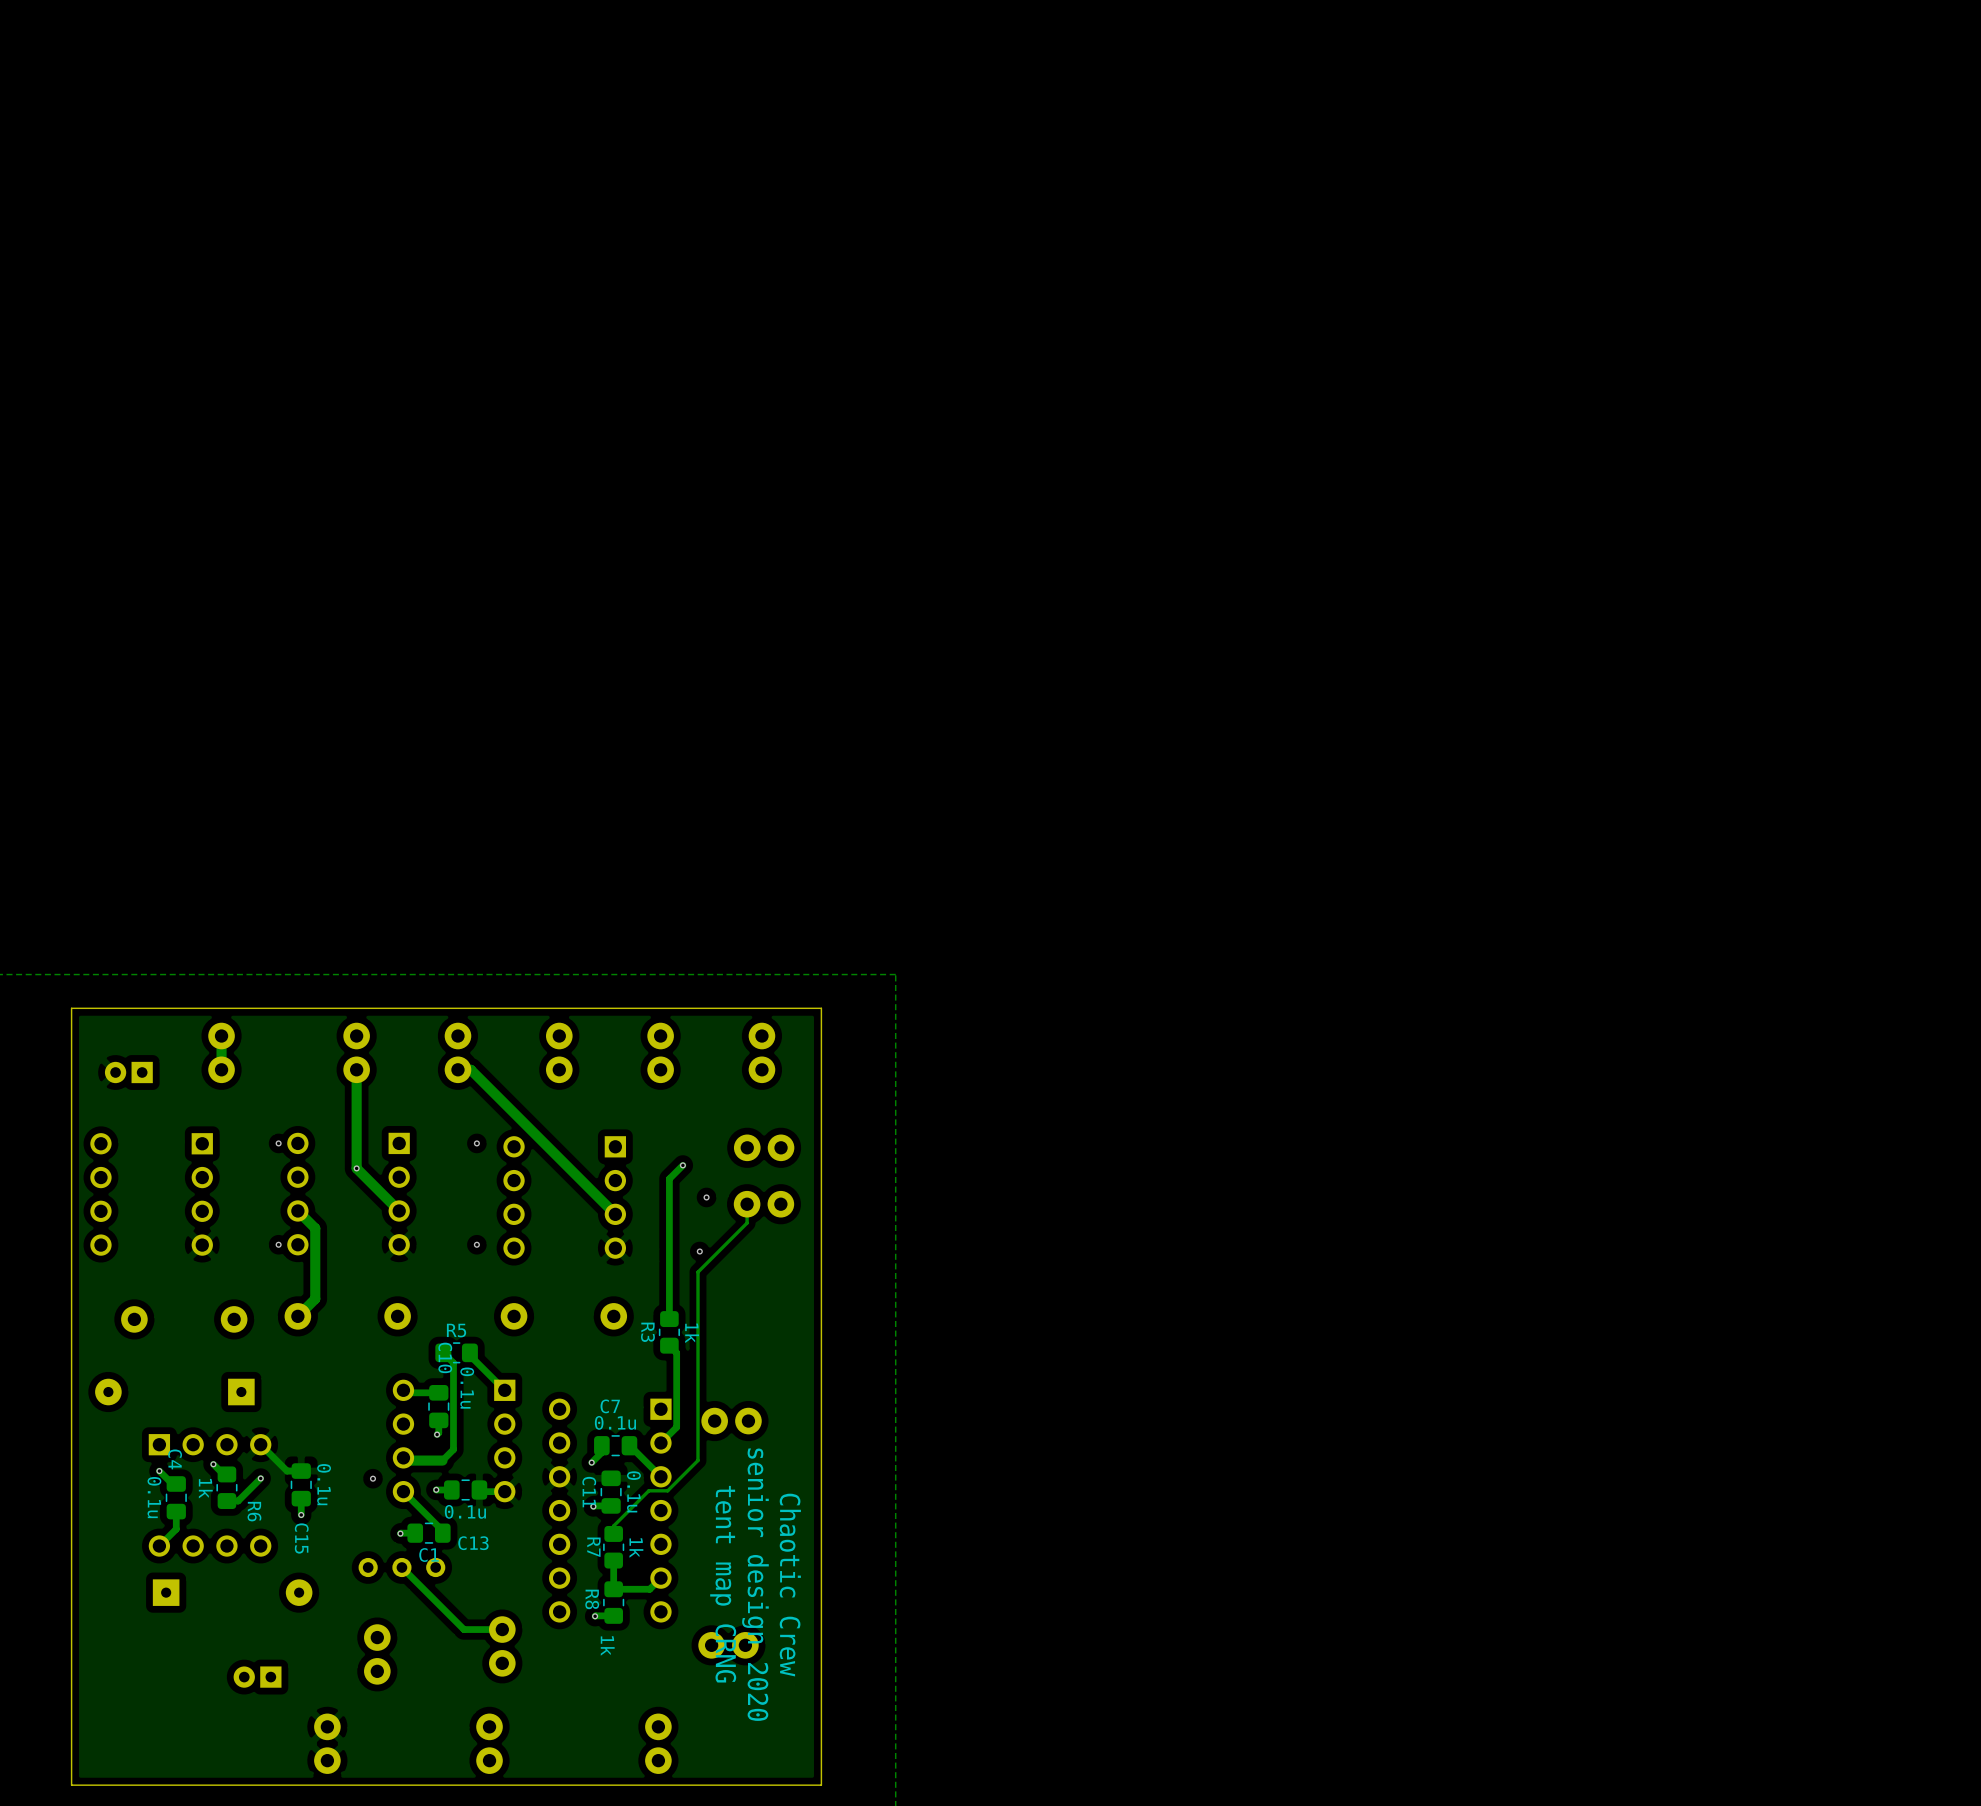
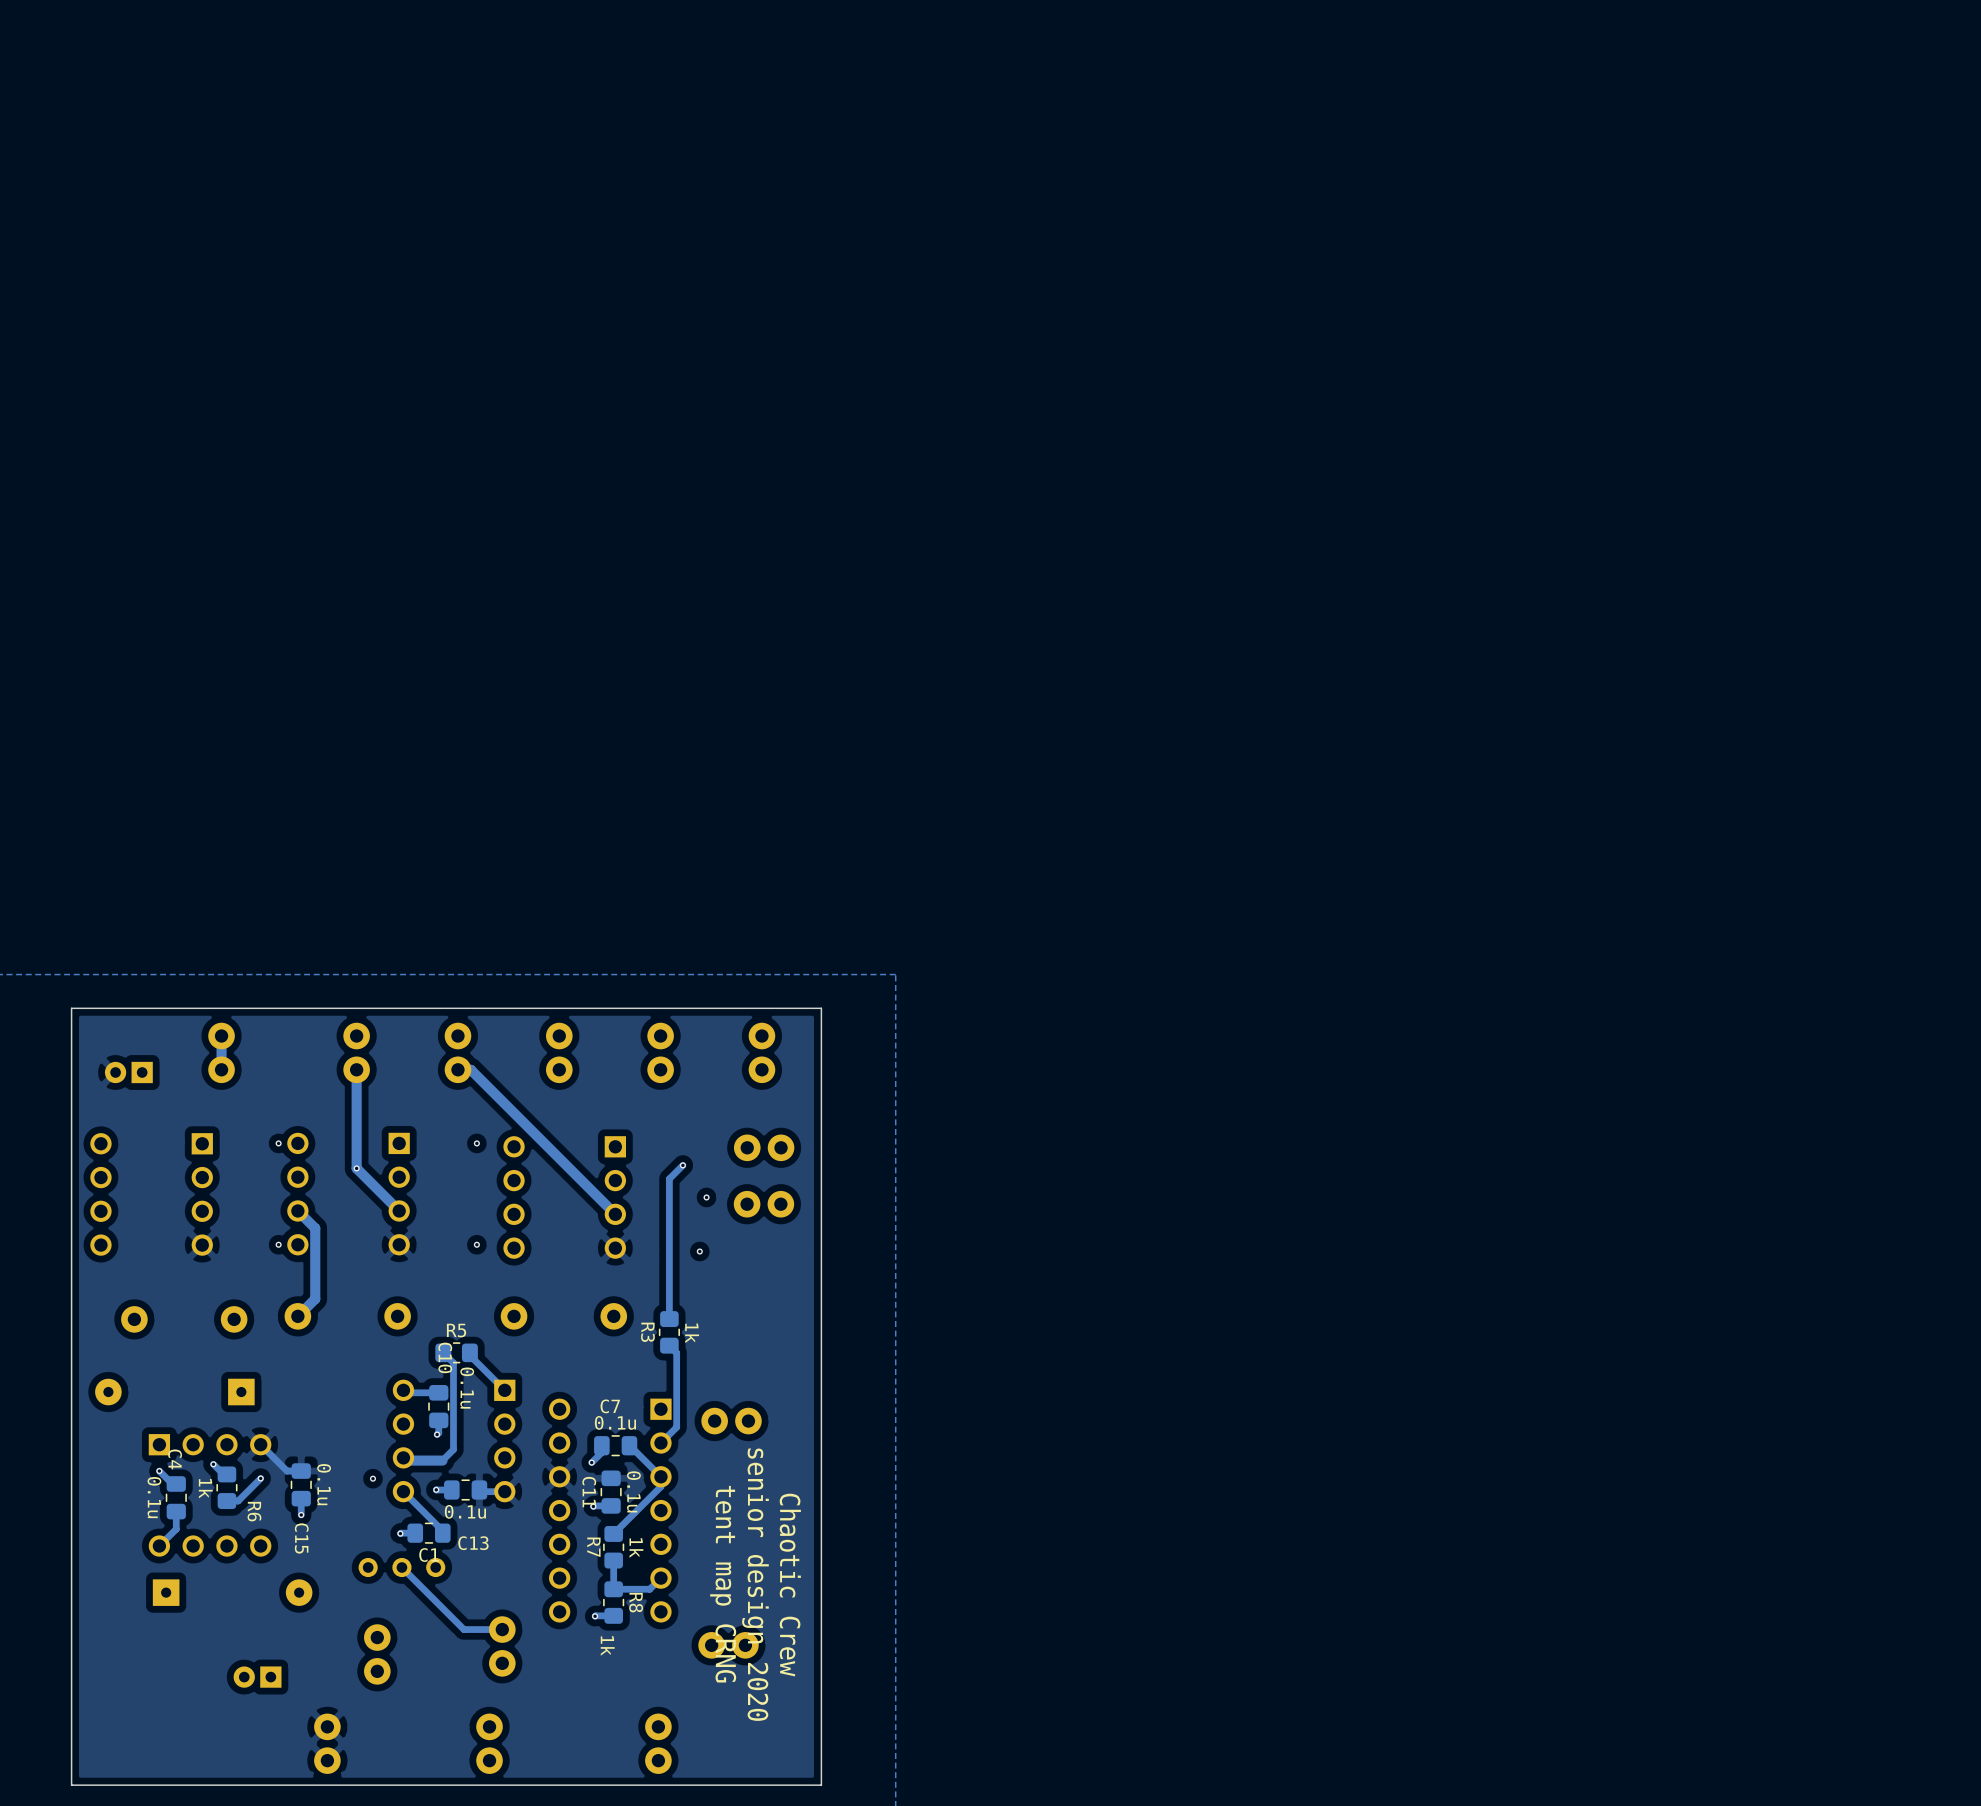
track: (747, 1204) (747, 1223) (697, 1272) (697, 1460) (667, 1490) (648, 1490) (613, 1525) (613, 1533) -> (660, 1476) (660, 1486) (613, 1533)
R8 name position: R8 (592, 1599) -> R8 (636, 1602)

